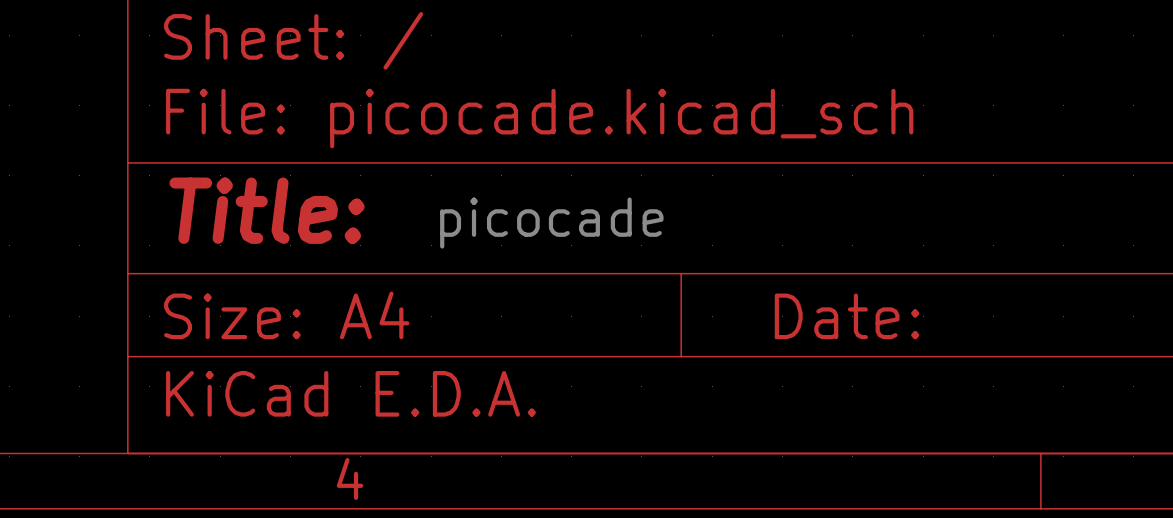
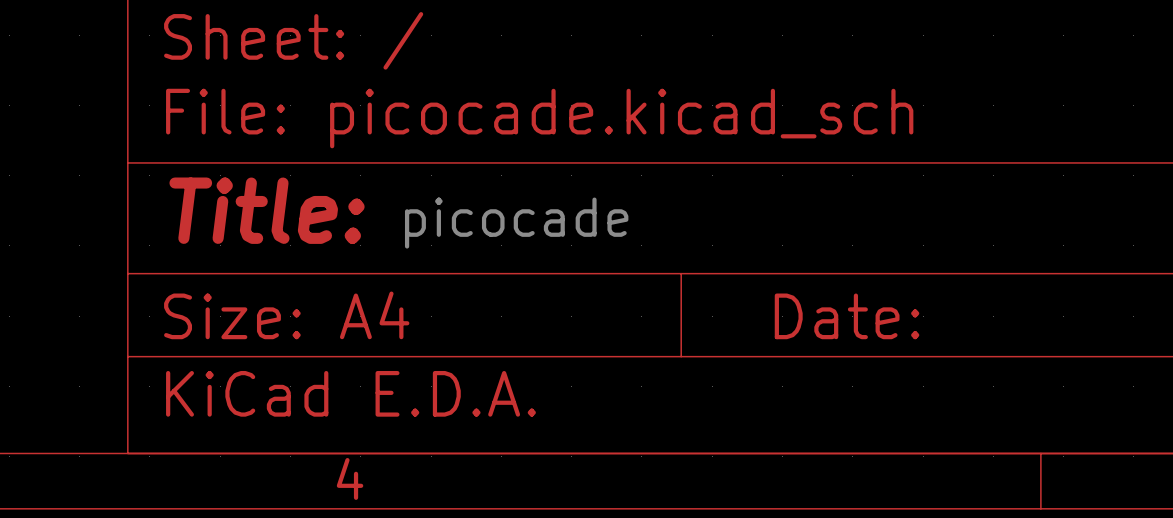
text position: picocade (551, 223) -> picocade (516, 223)

